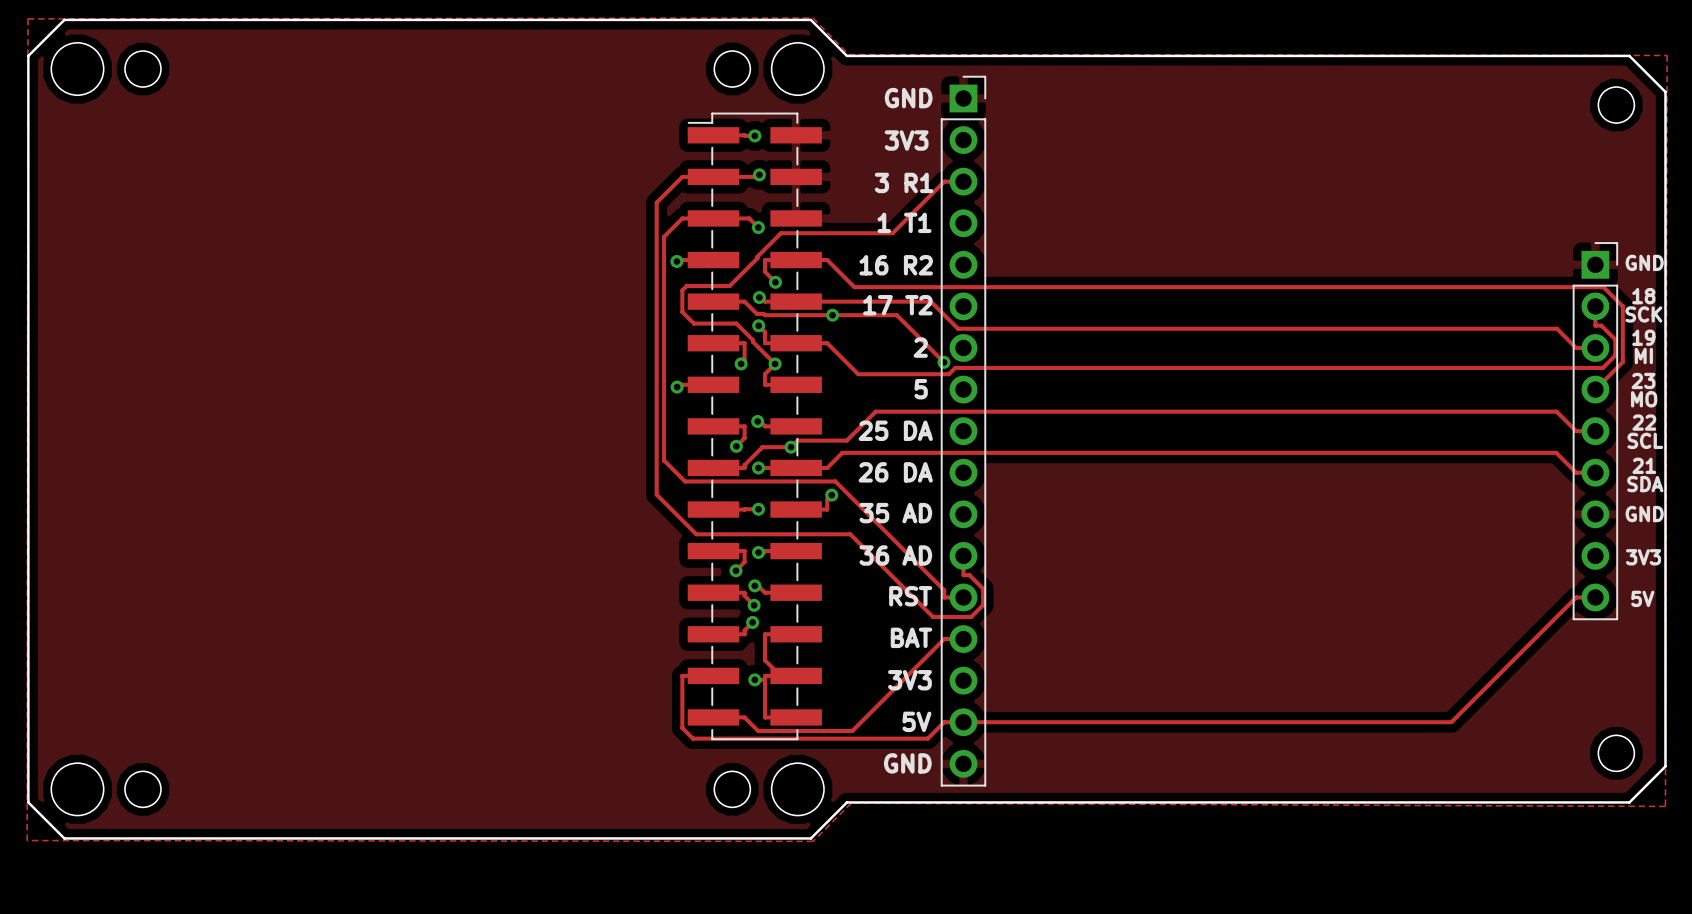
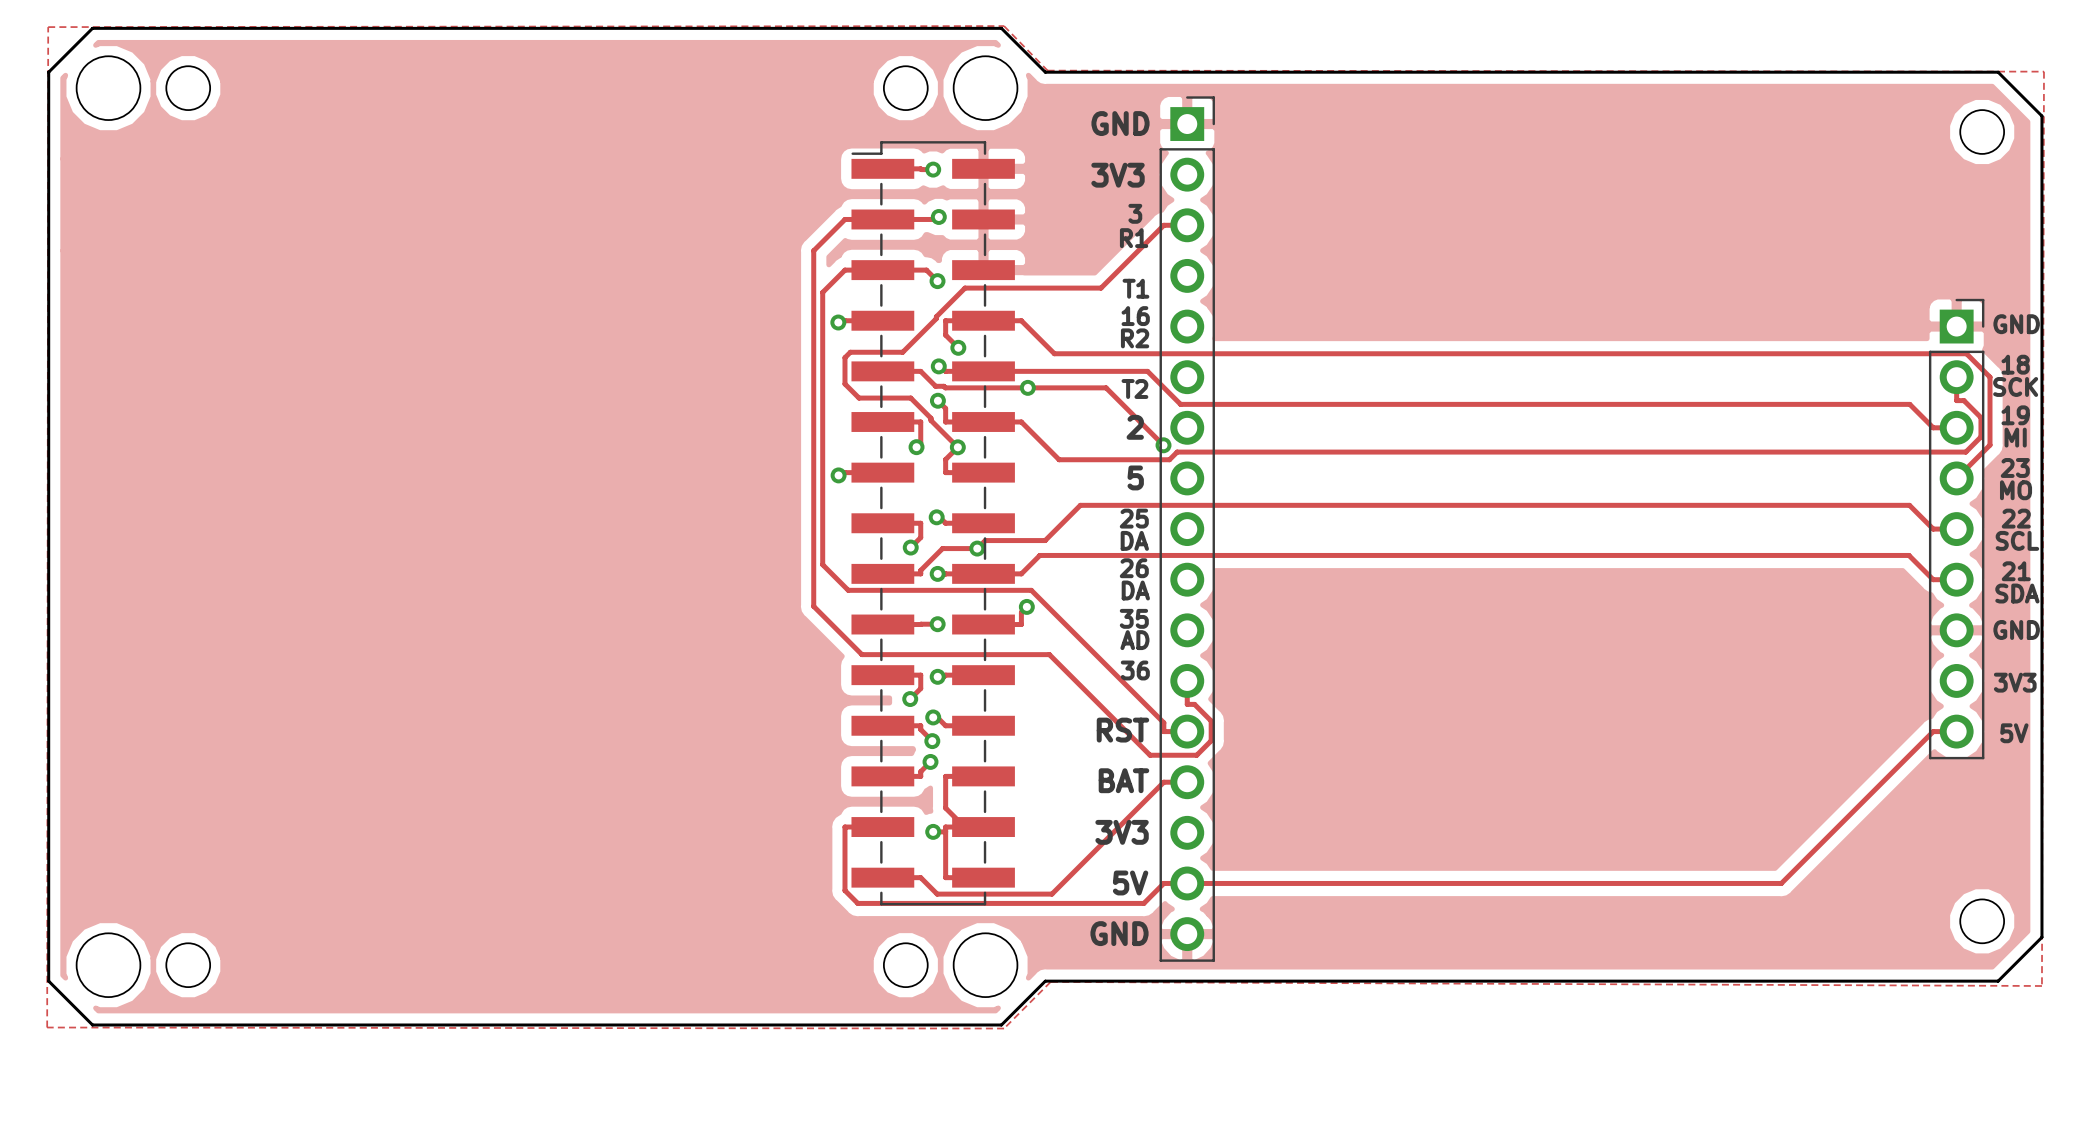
text: none -> 3 (1135, 213)
text: 3 R1 (904, 182) -> R1 (1134, 238)
text: 1 T1 (904, 222) -> T1 (1135, 288)
text: none -> 16 (1135, 316)
text: 16 R2 (896, 265) -> none
text: none -> R2 (1135, 338)
text: 17 T2 (897, 305) -> none
text: none -> T2 (1134, 388)
text: none -> 25 (1134, 518)
text: 25 DA (895, 430) -> none
text: none -> DA (1134, 540)
text: none -> 26 (1134, 568)
text: 26 DA (895, 472) -> none
text: none -> DA (1135, 590)
text: none -> 35 (1134, 618)
text: 35 AD (895, 513) -> none
text: none -> AD (1134, 640)
text: none -> 36 (1135, 670)
text: 36 AD (895, 555) -> none

